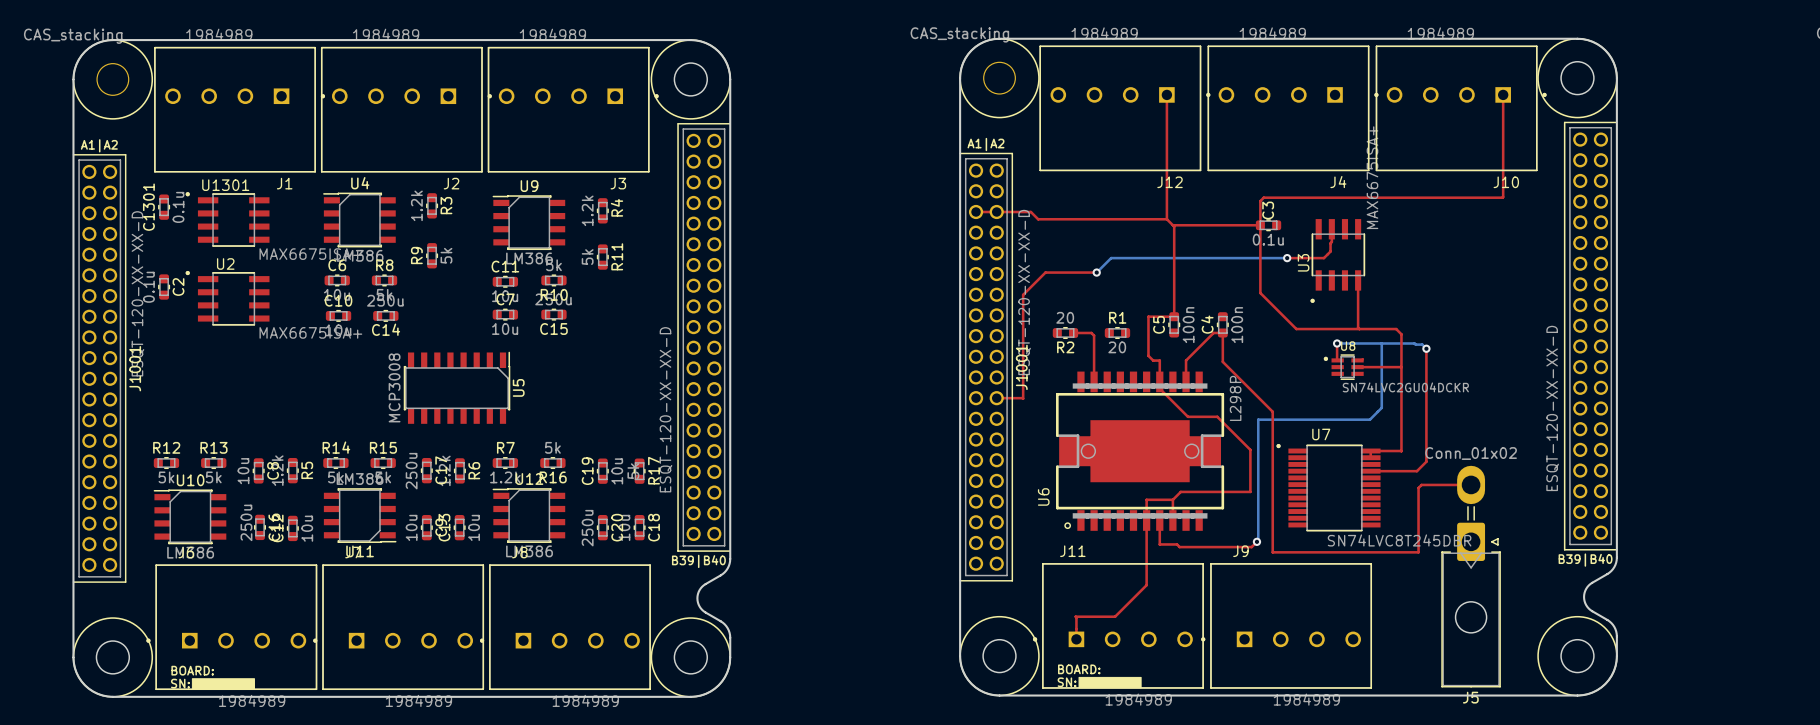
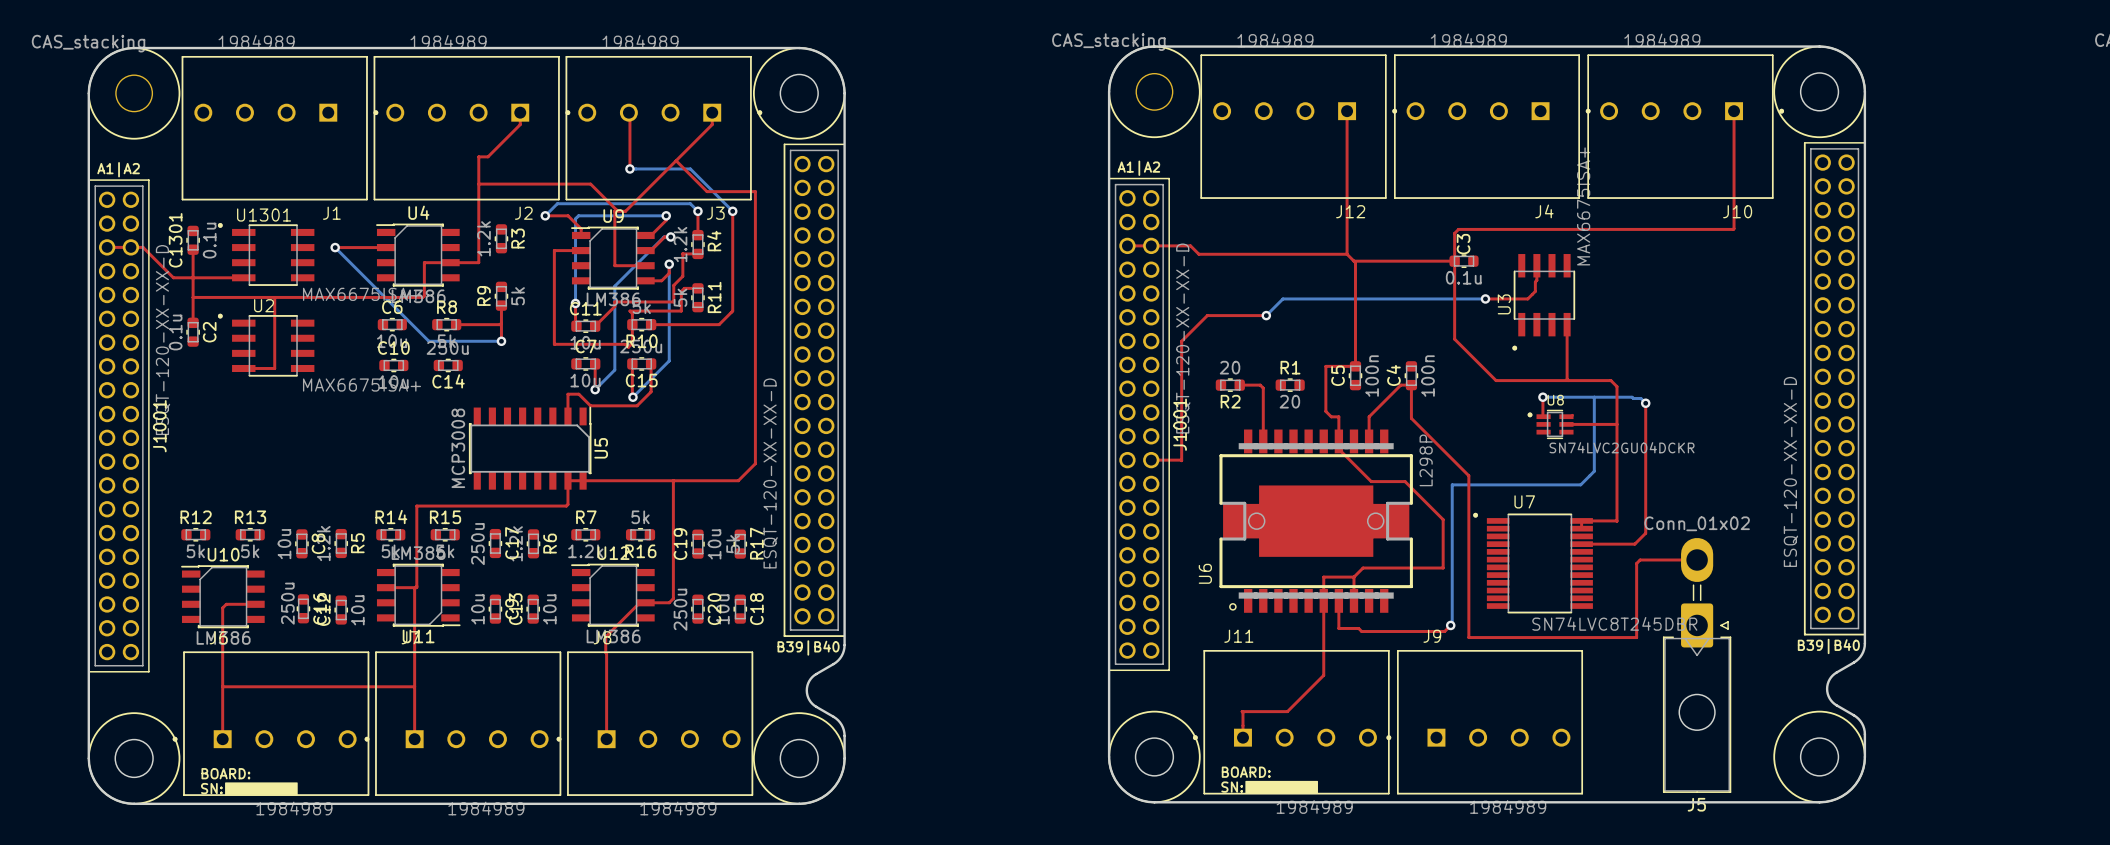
top track: none -> (520, 112) (520, 124) (488, 156) (478, 156) (478, 262) (424, 262) (422, 297) (193, 297)
top track: none -> (628, 112) (629, 168)
top track: none -> (712, 112) (712, 124) (625, 211) (614, 211)
top track: none -> (676, 160) (707, 191) (755, 191) (755, 463) (738, 480) (567, 480) (566, 506) (416, 506) (416, 587) (386, 587)
bottom track: none -> (629, 168) (690, 168) (732, 211)
via: none -> (629, 168)
top track: none -> (478, 184) (590, 184) (616, 209) (614, 211)
top track: none -> (614, 211) (614, 265) (645, 265)
top track: none -> (697, 211) (697, 235)
bottom track: none -> (697, 211) (690, 203) (557, 203) (545, 215)
via: none -> (697, 211)
top track: none -> (732, 211) (732, 311) (719, 324) (651, 324)
via: none -> (732, 211)
top track: none -> (545, 215) (568, 215) (581, 228) (581, 235)
via: none -> (545, 215)
top track: none -> (666, 215) (666, 220) (651, 235) (645, 235)
bottom track: none -> (666, 215) (578, 215) (575, 218) (575, 303)
via: none -> (666, 215)
top track: none -> (670, 236) (664, 236) (651, 250) (645, 250)
bottom track: none -> (670, 236) (664, 236) (614, 286) (614, 370) (595, 389)
via: none -> (670, 236)
top track: none -> (107, 247) (143, 247) (173, 277) (243, 277)
top track: none -> (335, 247) (386, 247)
bottom track: none -> (335, 247) (428, 341) (501, 341)
via: none -> (335, 247)
top track: none -> (193, 249) (193, 322)
top track: none -> (581, 250) (554, 250) (554, 344) (625, 344) (628, 347) (632, 343) (632, 313) (629, 311) (681, 311) (681, 291) (684, 288) (697, 288)
top track: none -> (697, 253) (682, 253) (682, 276) (673, 285) (673, 301) (614, 301) (614, 306) (595, 326)
top track: none -> (669, 264) (669, 273) (661, 280) (645, 280)
bottom track: none -> (669, 264) (669, 360) (632, 397)
via: none -> (669, 264)
top track: none -> (274, 297) (274, 368) (243, 368)
top track: none -> (575, 303) (576, 326)
via: none -> (575, 303)
top track: none -> (501, 305) (501, 341)
top track: none -> (501, 323) (456, 324)
via: none -> (501, 341)
top track: none -> (595, 363) (595, 389)
top track: none -> (632, 363) (632, 397)
top track: none -> (651, 363) (651, 391) (637, 405) (590, 405) (578, 394) (567, 394) (567, 416)
via: none -> (595, 389)
via: none -> (632, 397)
top track: none -> (673, 480) (673, 598) (669, 602) (639, 602) (605, 636) (606, 739)
top track: none -> (416, 586) (414, 588) (414, 739)
top track: none -> (255, 604) (226, 604) (222, 607) (222, 739)
top track: none -> (414, 686) (222, 686)

